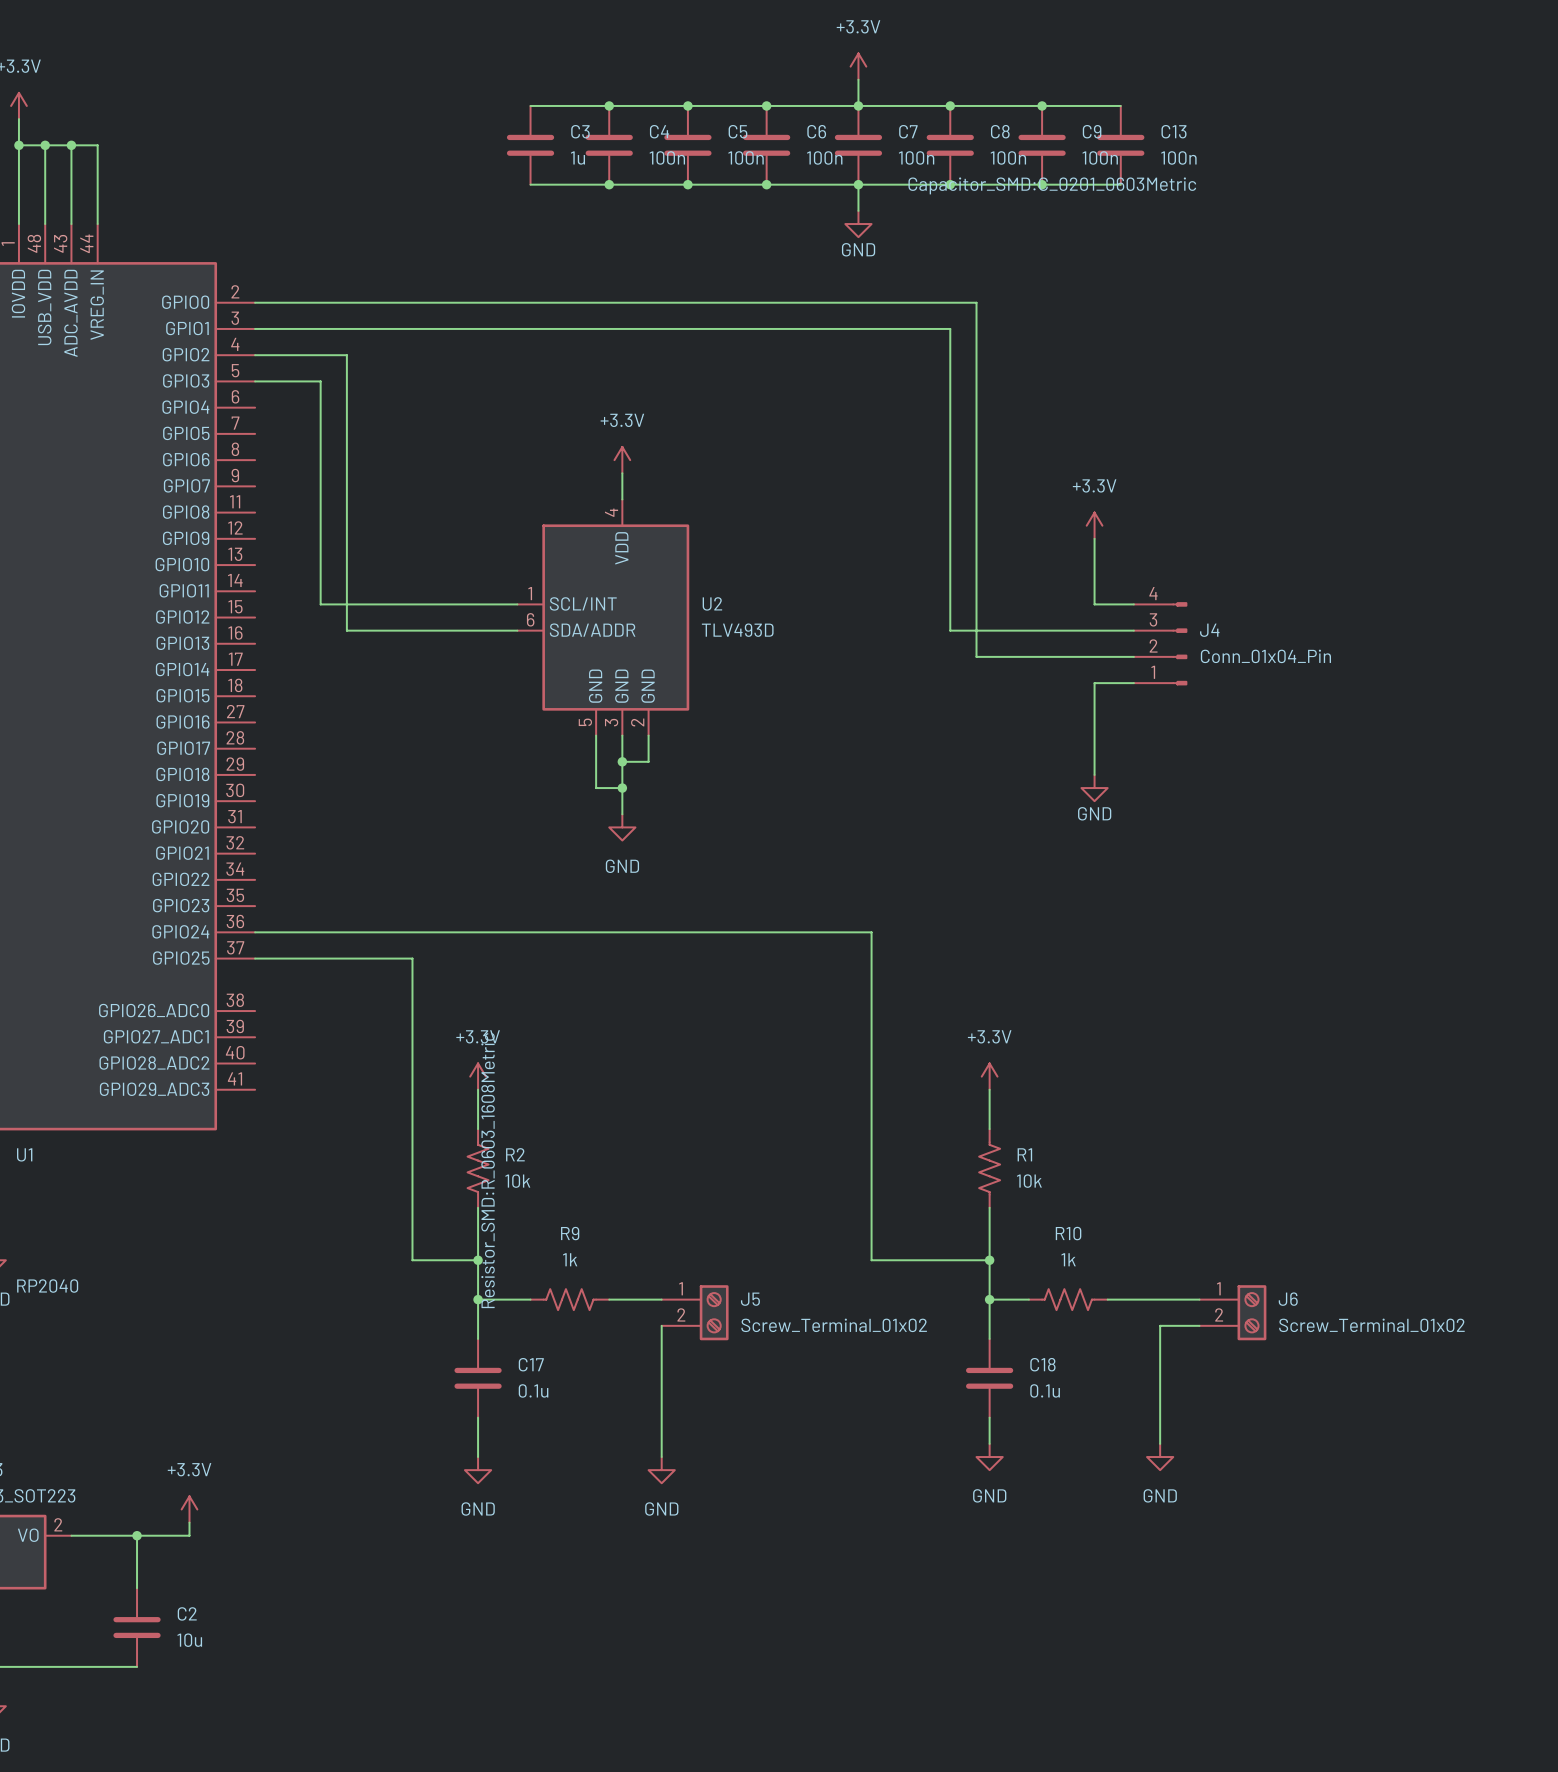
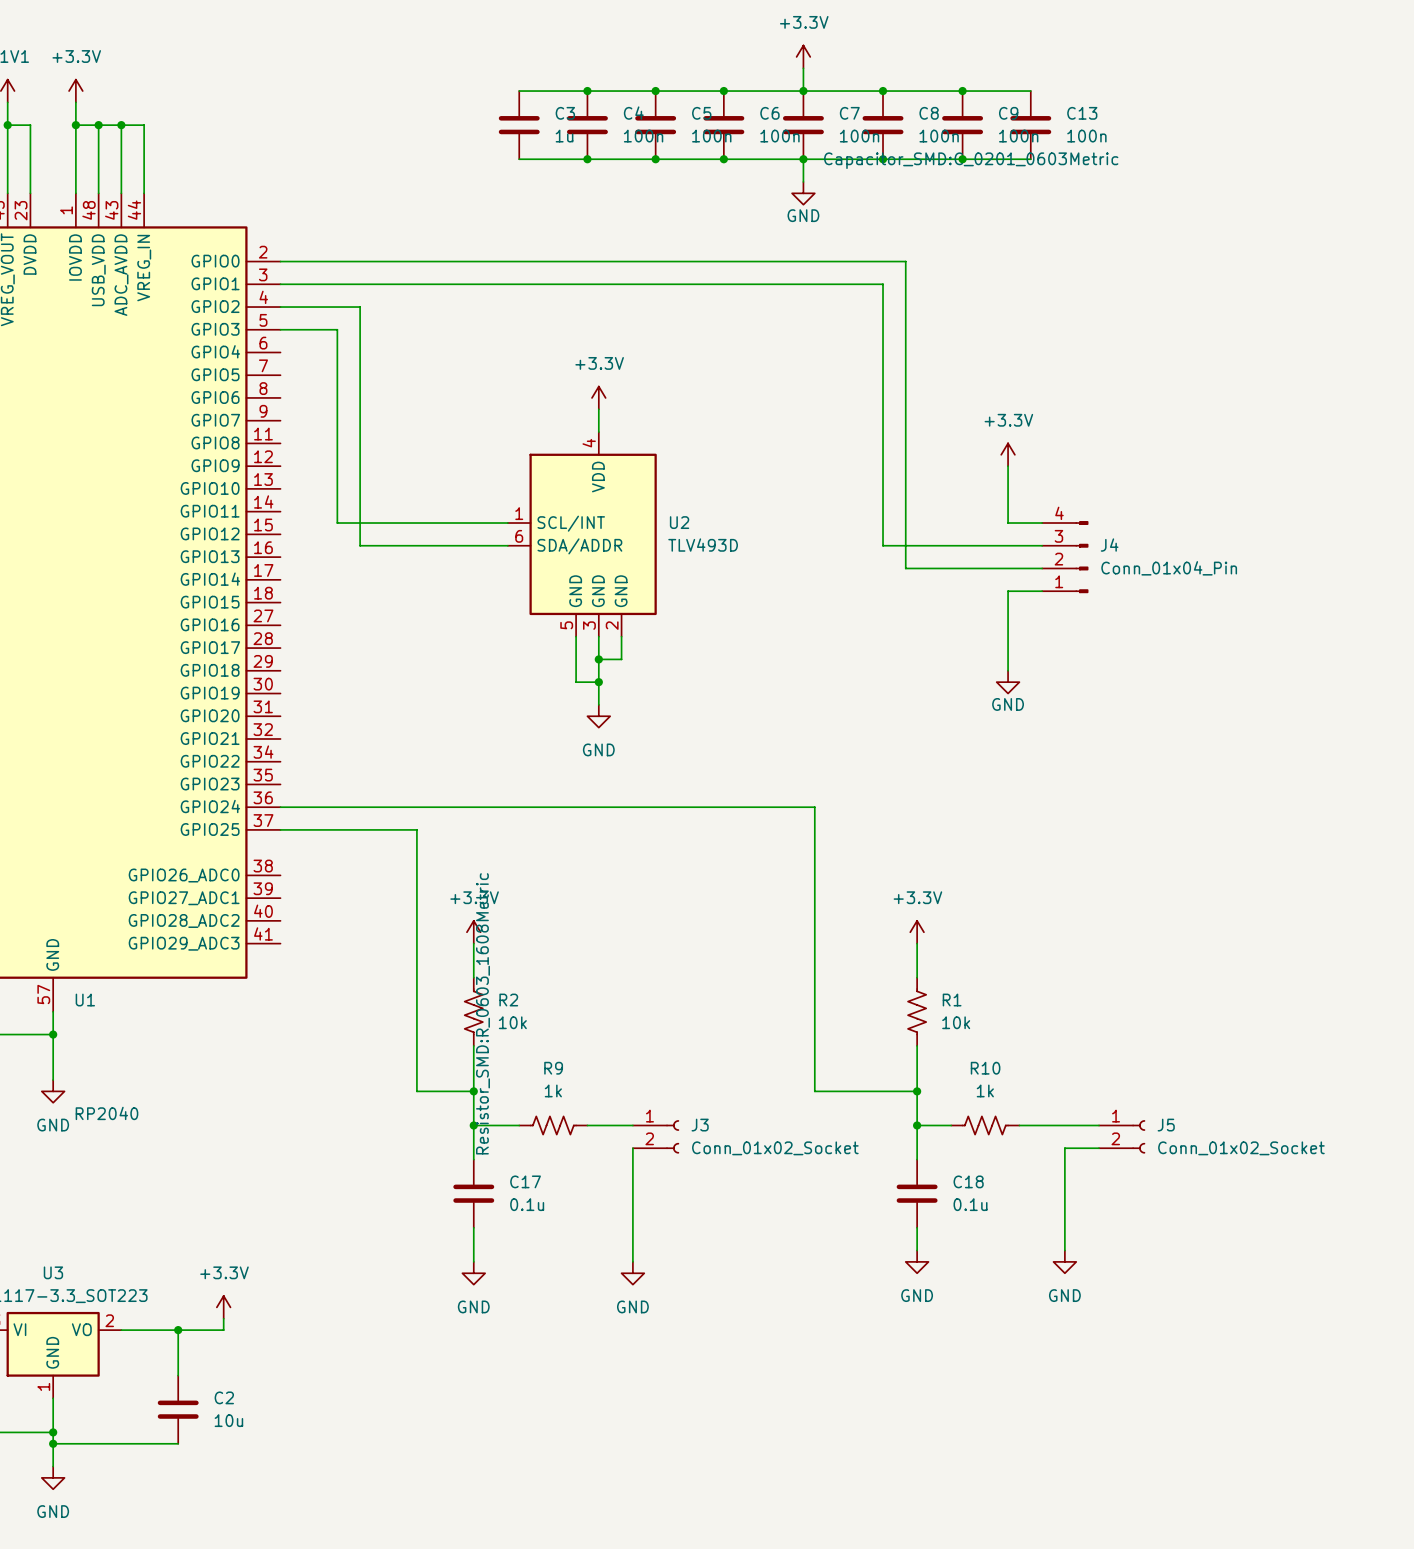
J5 symbol: [661, 1285, 729, 1341] -> [1098, 1120, 1146, 1154]
J3: none -> Conn_01x02_Socket (655, 1136)
J6: Screw_Terminal_01x02 (1232, 1312) -> none
J5 value: Screw_Terminal_01x02 (834, 1325) -> Conn_01x02_Socket (1241, 1148)

